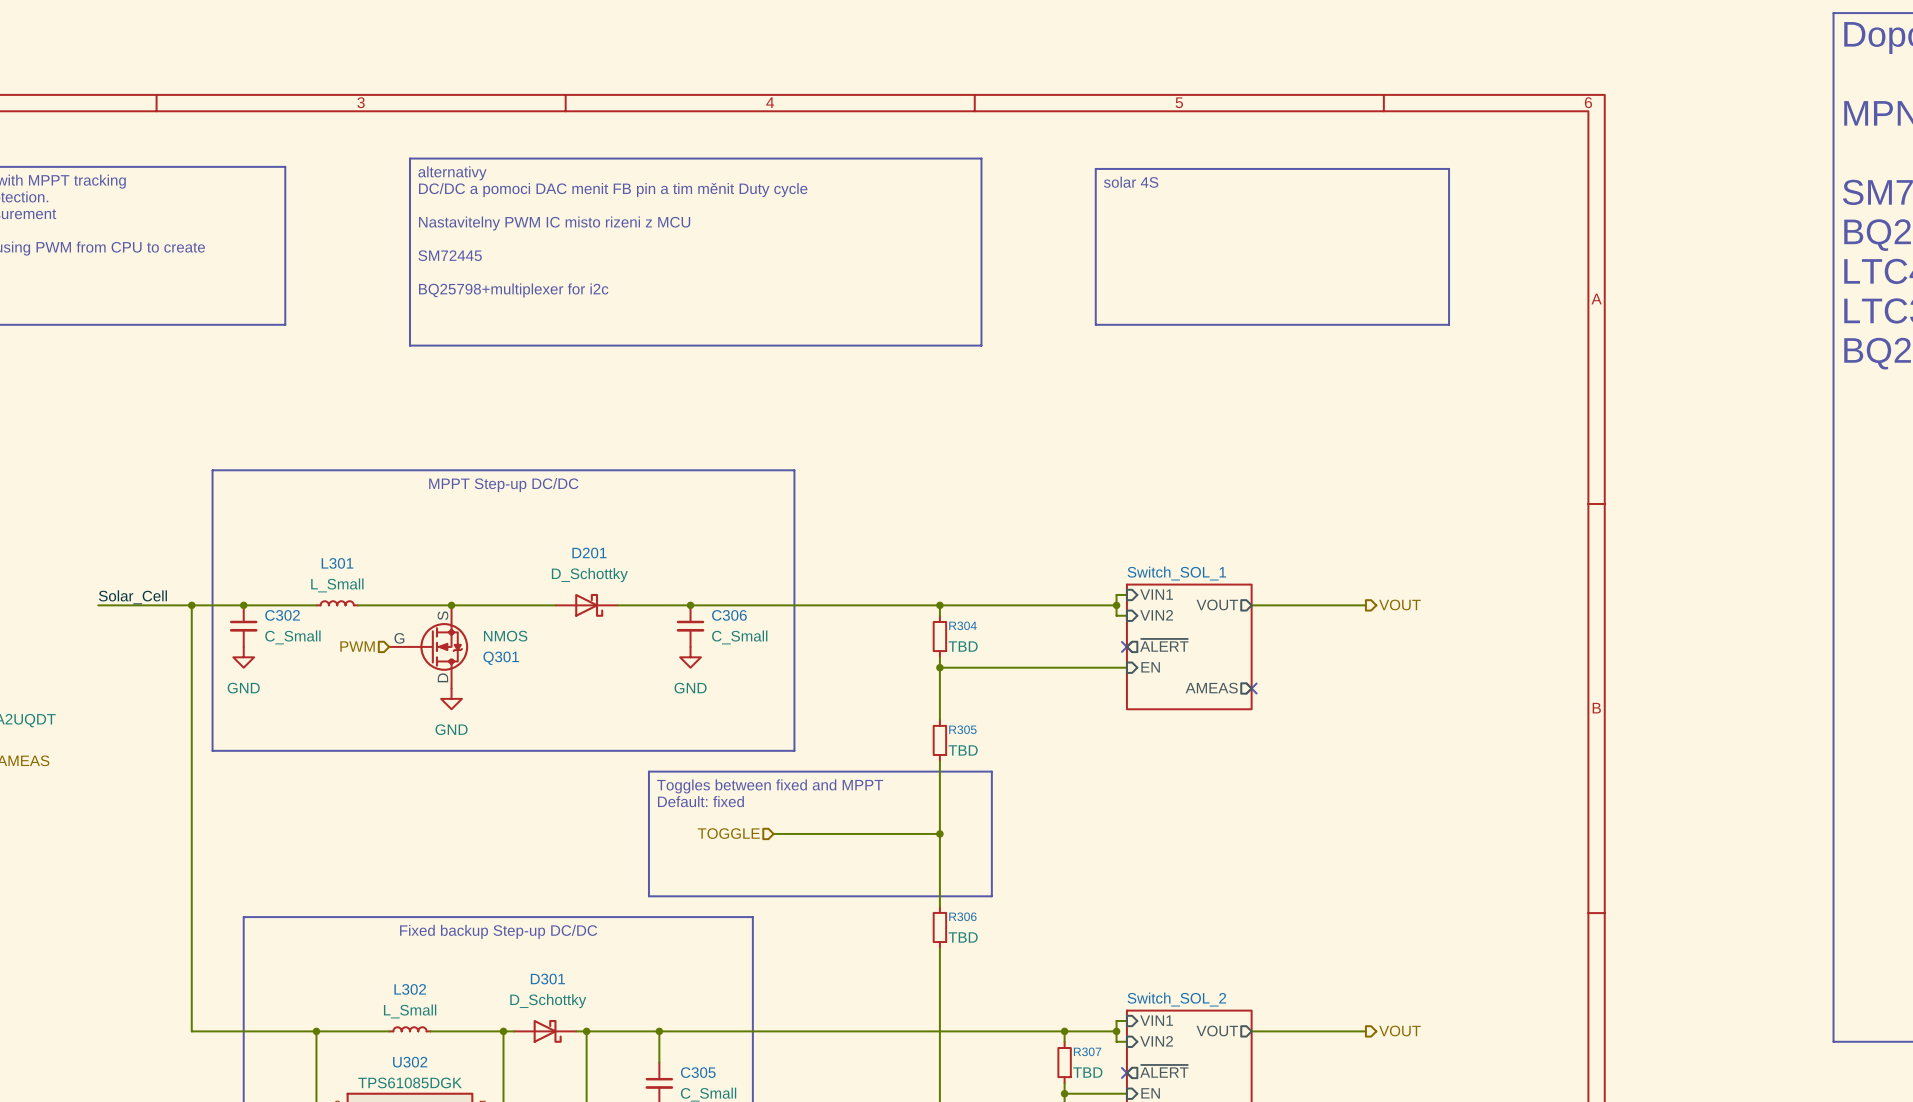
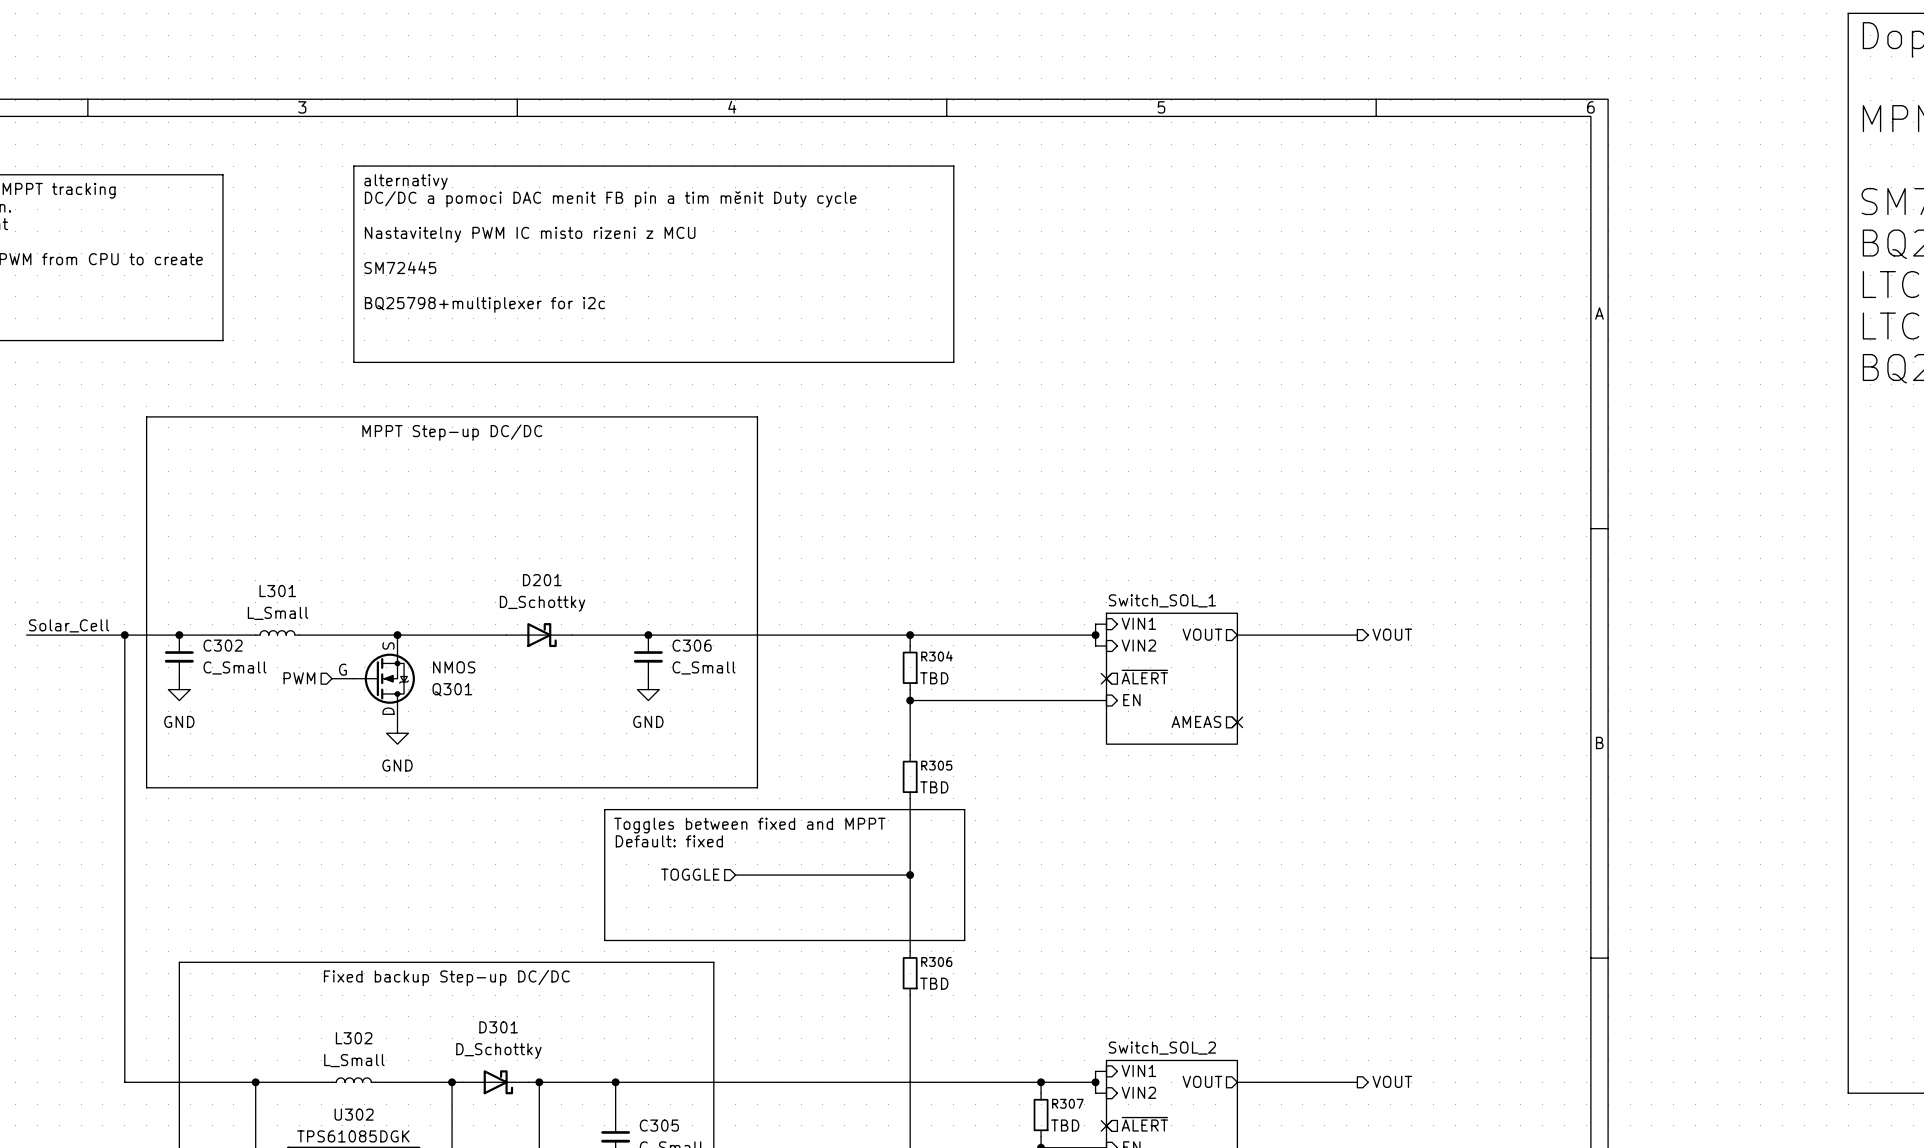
line: (1095, 168) (1449, 168) (1449, 324) (1095, 324) (1095, 168) -> none
text: solar 4S (1131, 182) -> none
line: (212, 470) (794, 470) -> (146, 493) (146, 416) (757, 416) (757, 493)
text position: MPPT Step-up DC/DC (503, 485) -> MPPT Step-up DC/DC (452, 432)

